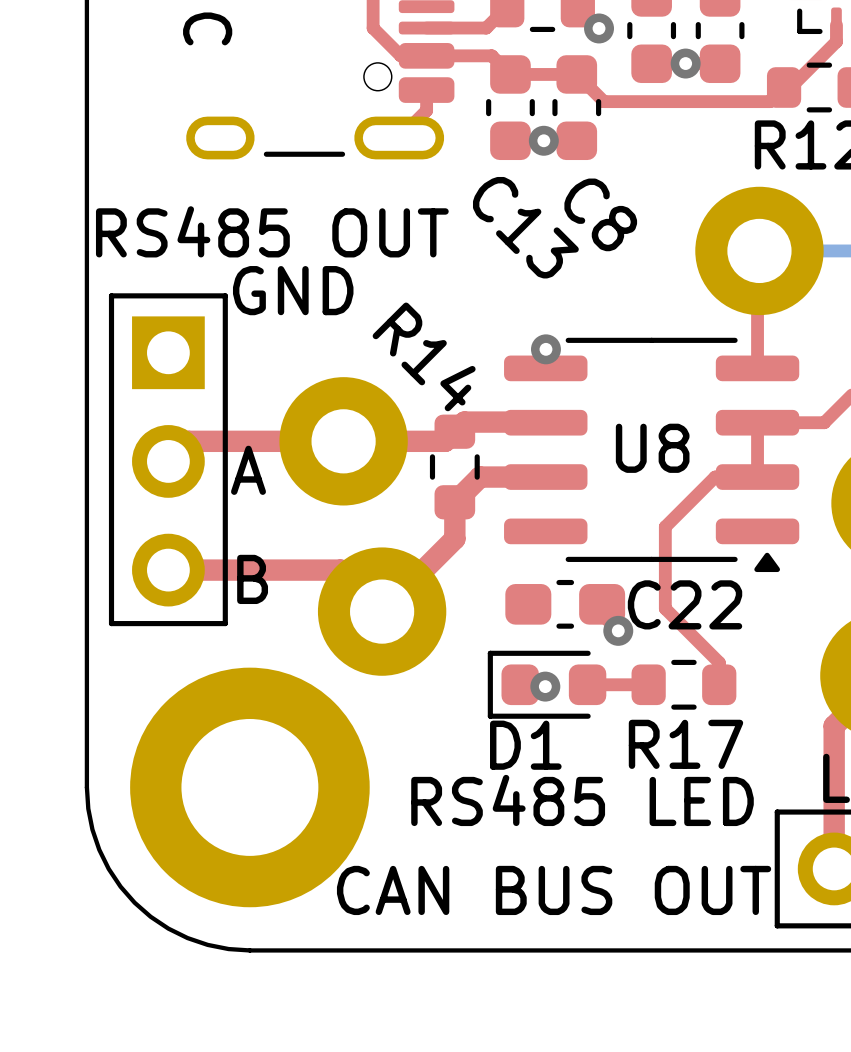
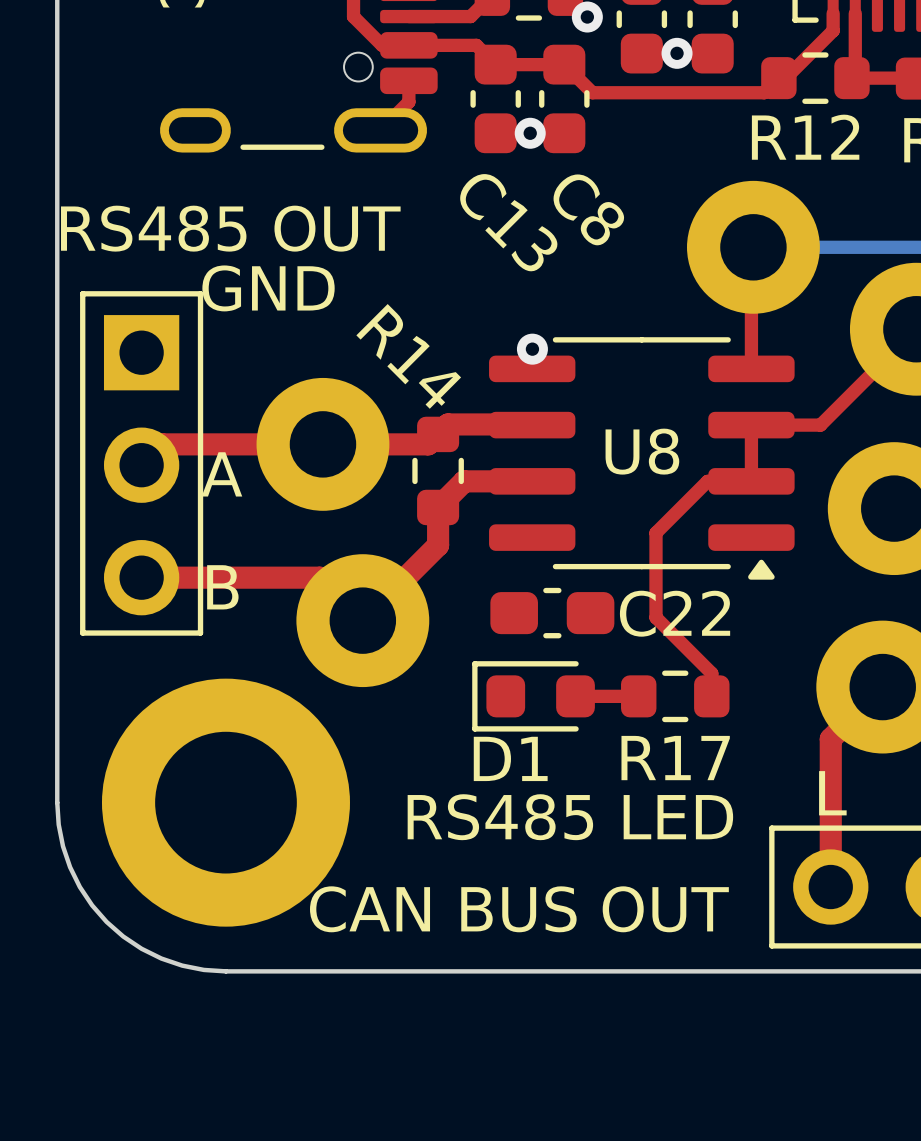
via: (618, 630) -> none
via: (545, 686) -> none

